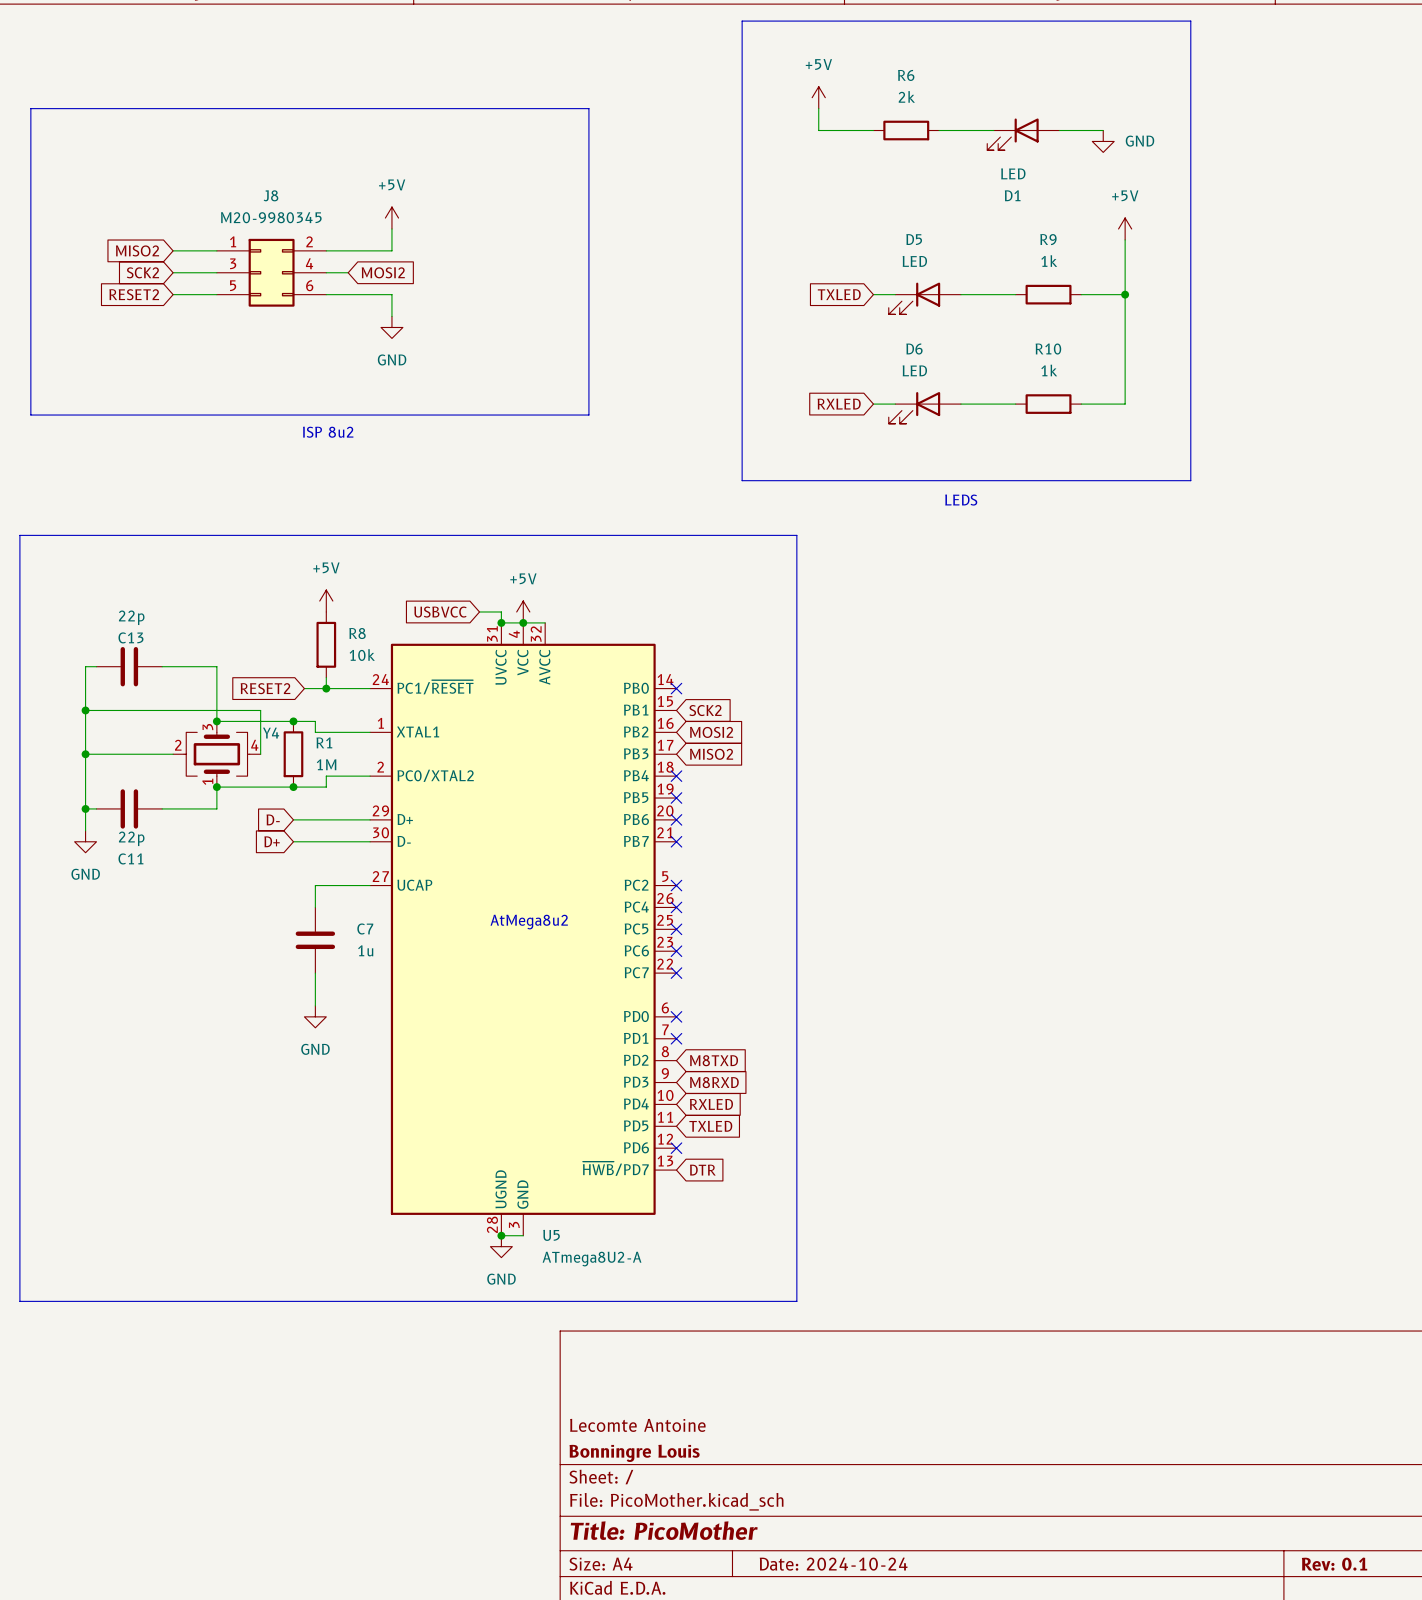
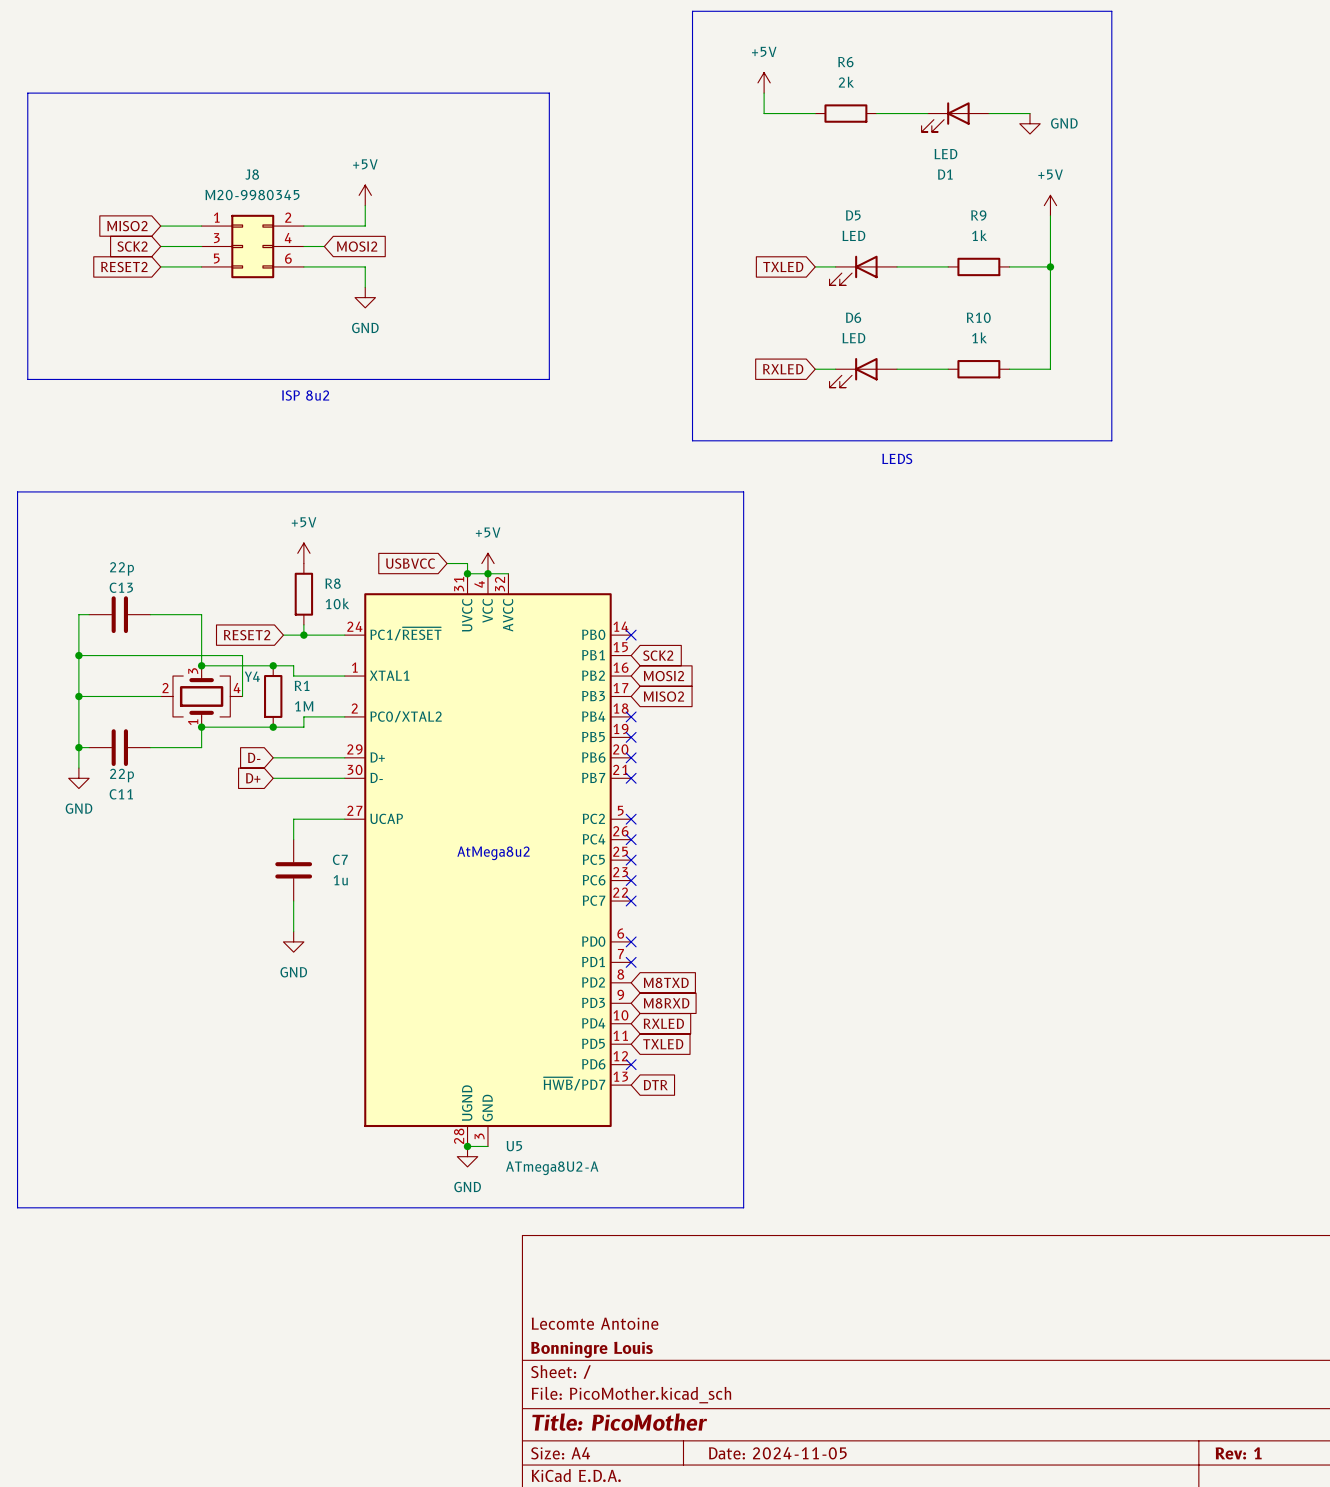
title block: Date: 2024-10-24 (833, 1564) -> Date: 2024-11-05 (777, 1453)
title block: Rev: 0.1 (1334, 1564) -> Rev: 1 (1238, 1453)

